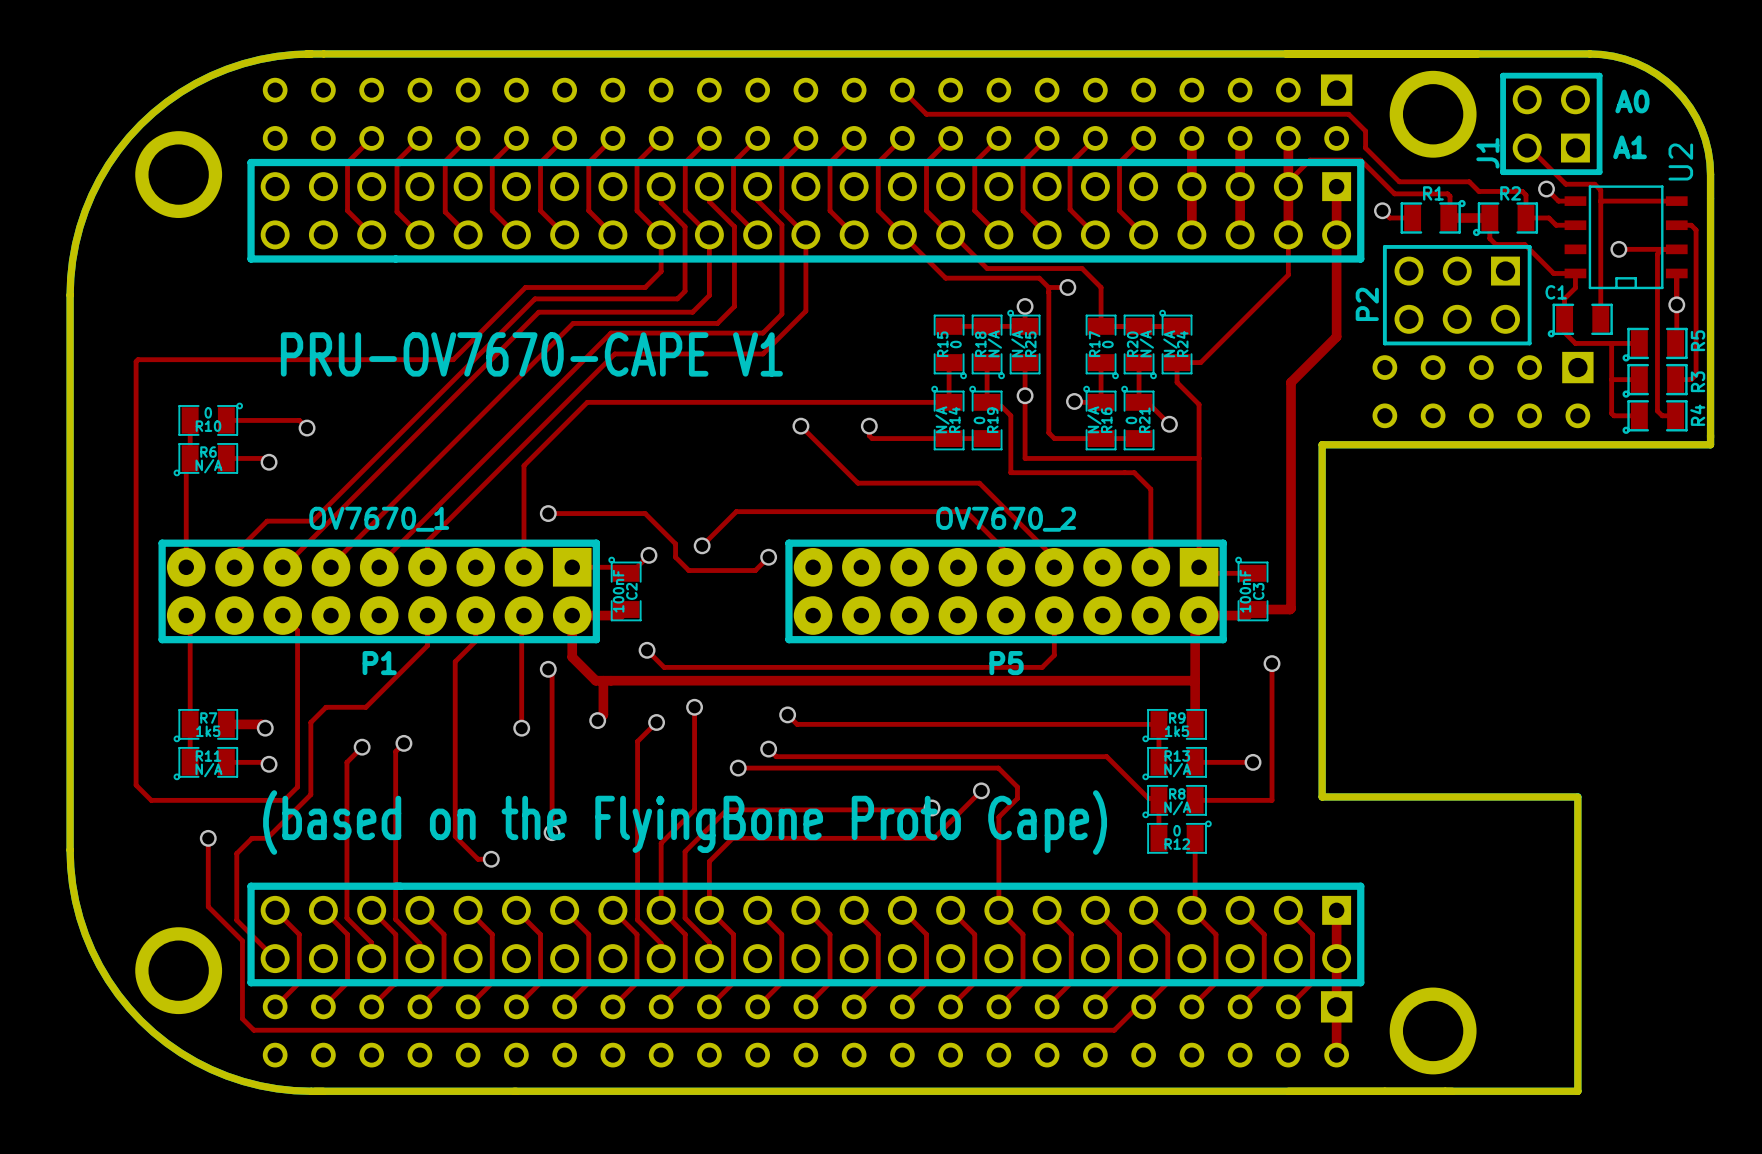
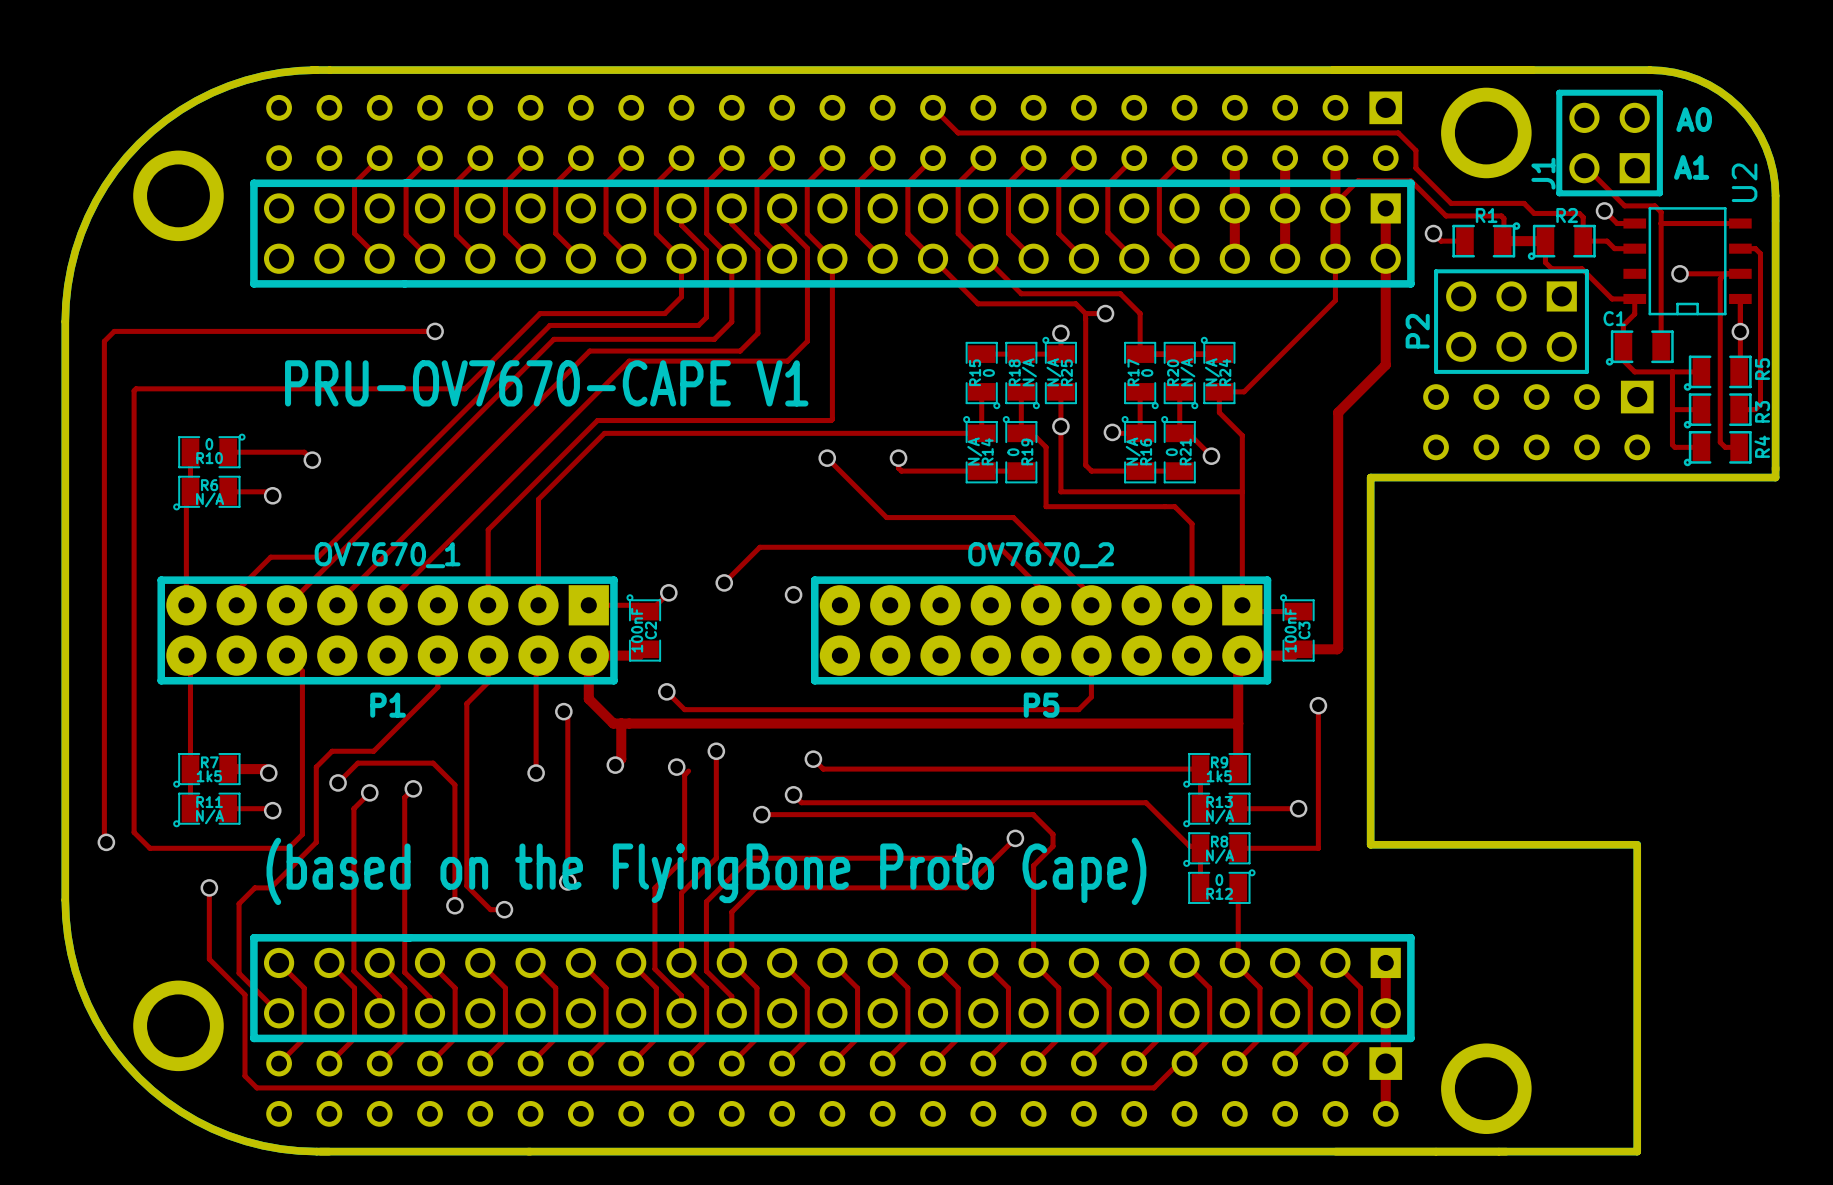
track: none -> (435, 331) (114, 331) (104, 341) (104, 840) (106, 842)
via: none -> (435, 331)
track: (805, 311) (762, 353) (614, 353) (427, 541) (427, 567) -> (832, 338) (831, 420) (597, 420) (488, 529) (488, 605)
track: (548, 513) (645, 513) (675, 543) (675, 557) (688, 570) (755, 570) (768, 557) -> none
via: (548, 513) -> none
track: (656, 722) (637, 741) (637, 920) (661, 943) -> (688, 771) (684, 775) (684, 858) (654, 887) (654, 969) (681, 997)
track: none -> (338, 782) (357, 763) (433, 763) (454, 784) (454, 905)
via: none -> (338, 782)
via: none -> (106, 842)
via: none -> (454, 905)

